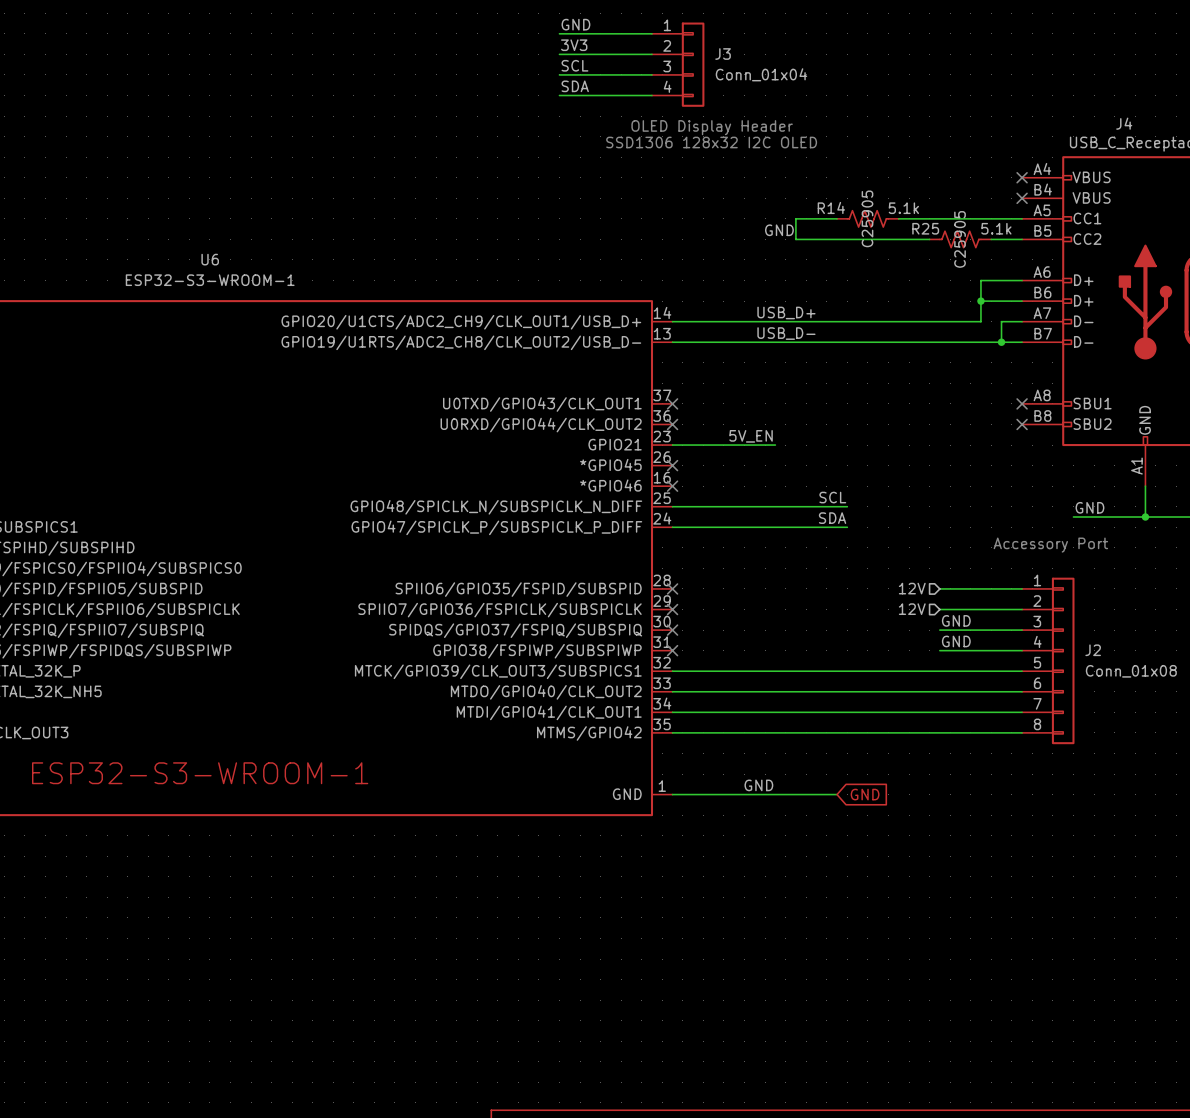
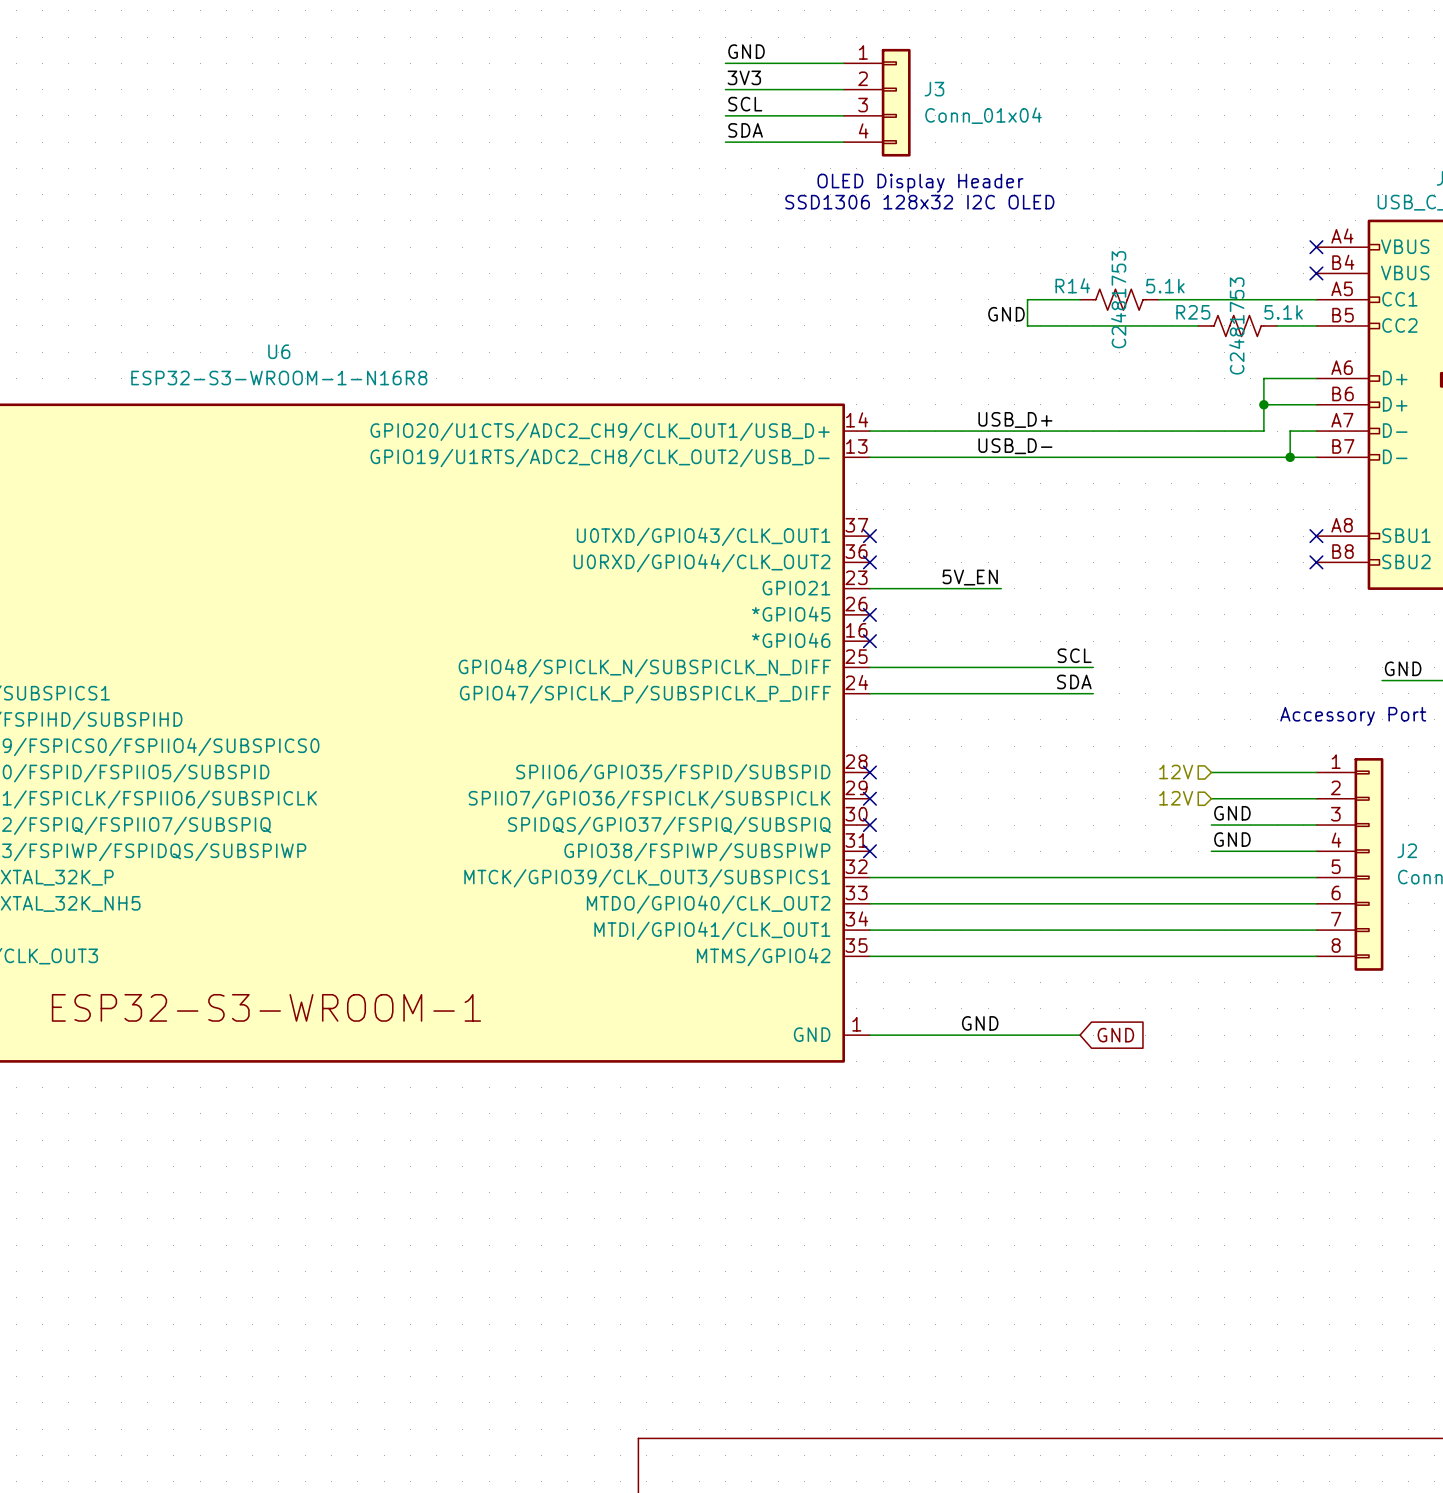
R14 text: C25905 (867, 218) -> C2481753 (1118, 299)
R25 text: C25905 (960, 239) -> C2481753 (1236, 325)
U6 value: ESP32-S3-WROOM-1 (210, 280) -> ESP32-S3-WROOM-1-N16R8 (279, 378)

